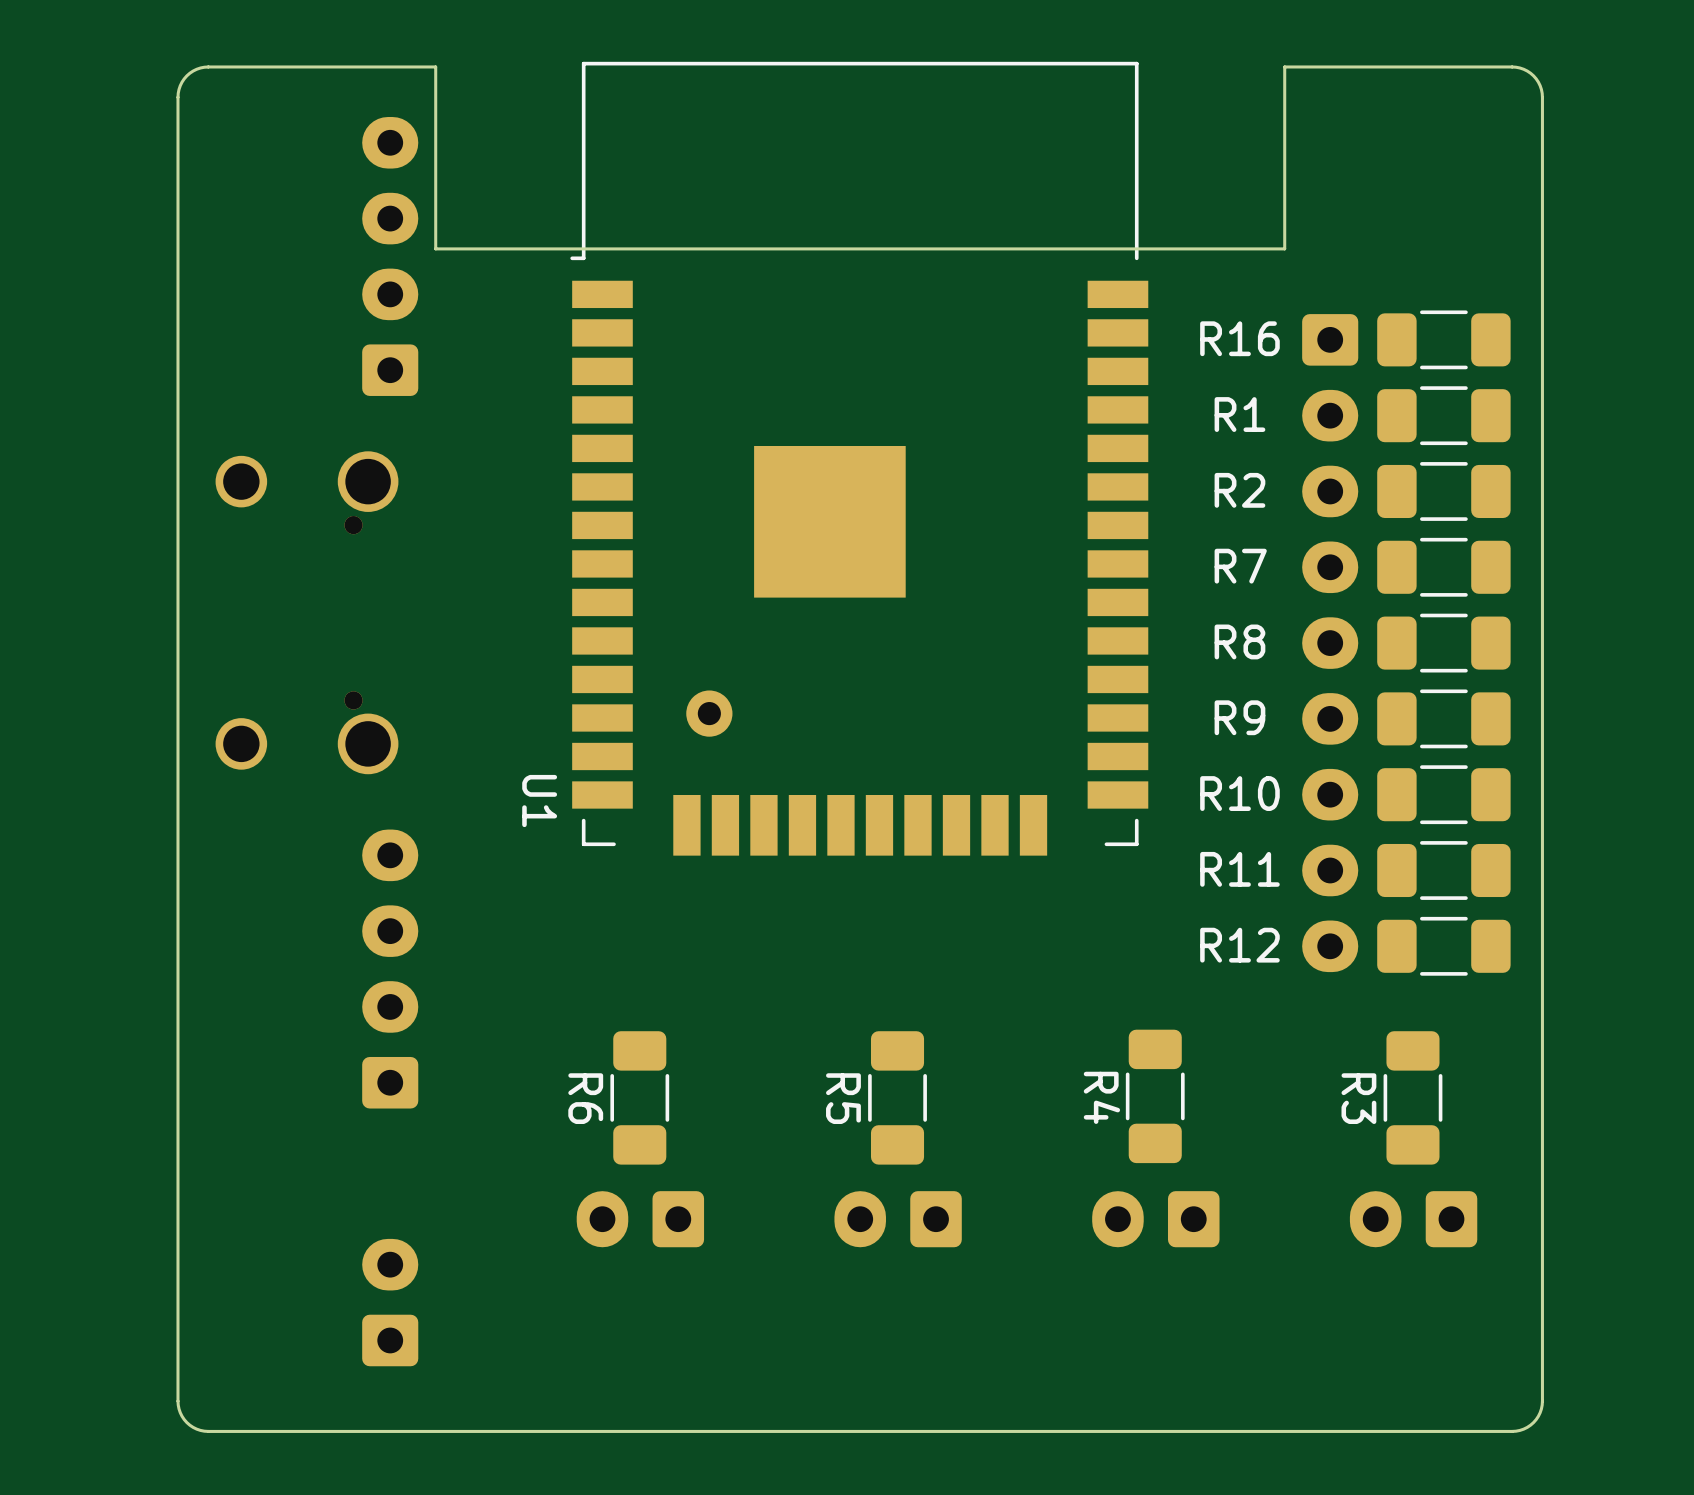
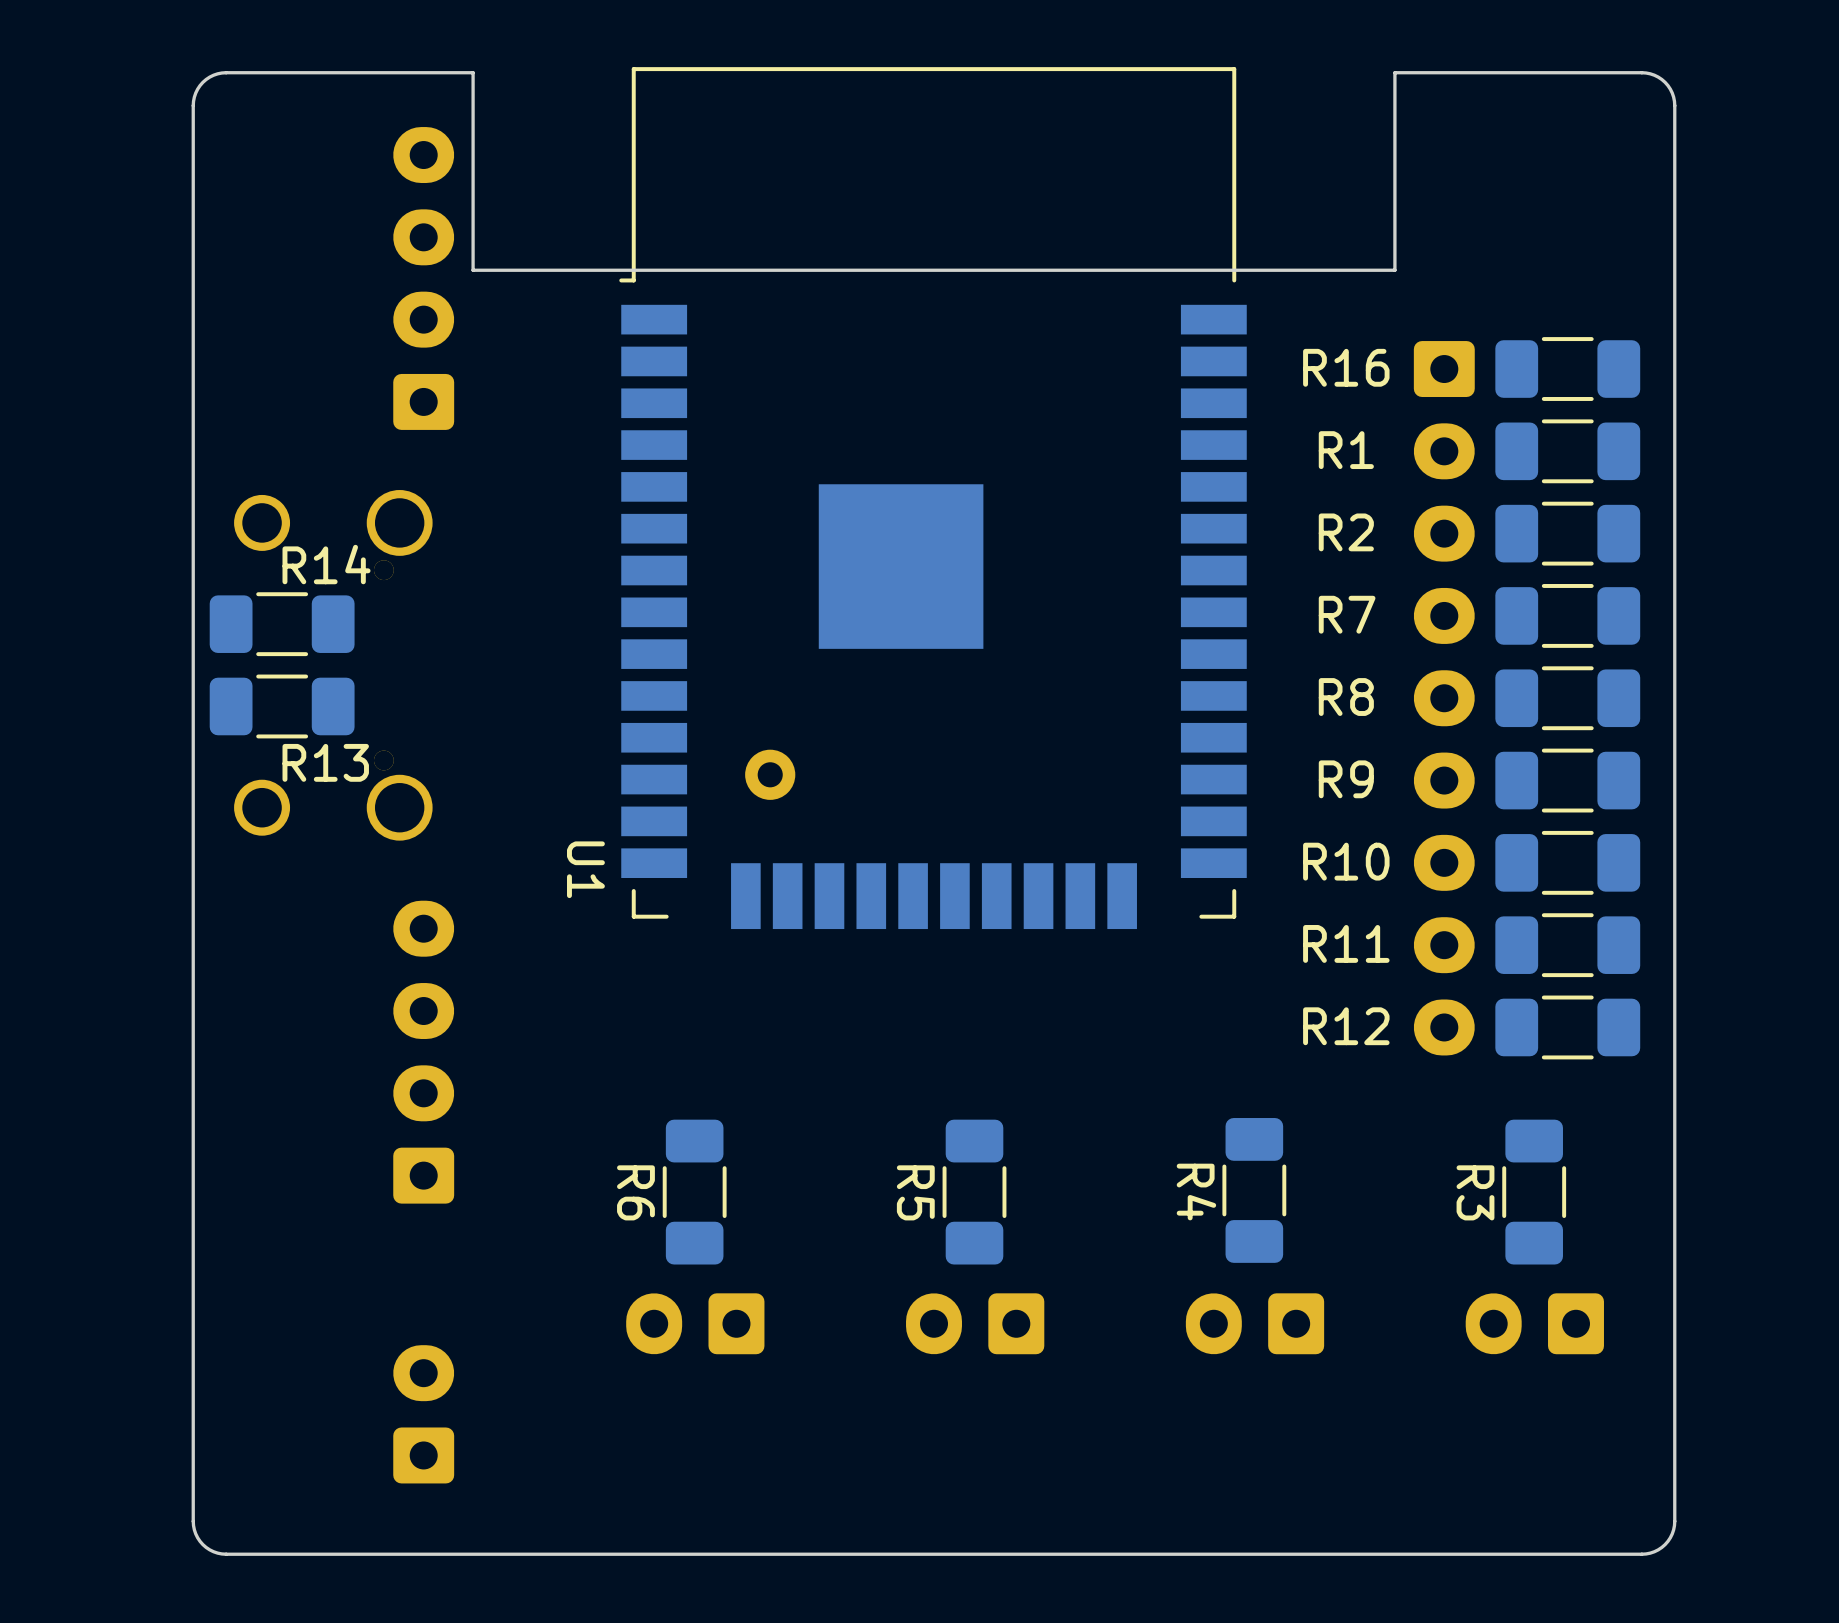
R14: none -> (282, 624)
R13: none -> (282, 706)

